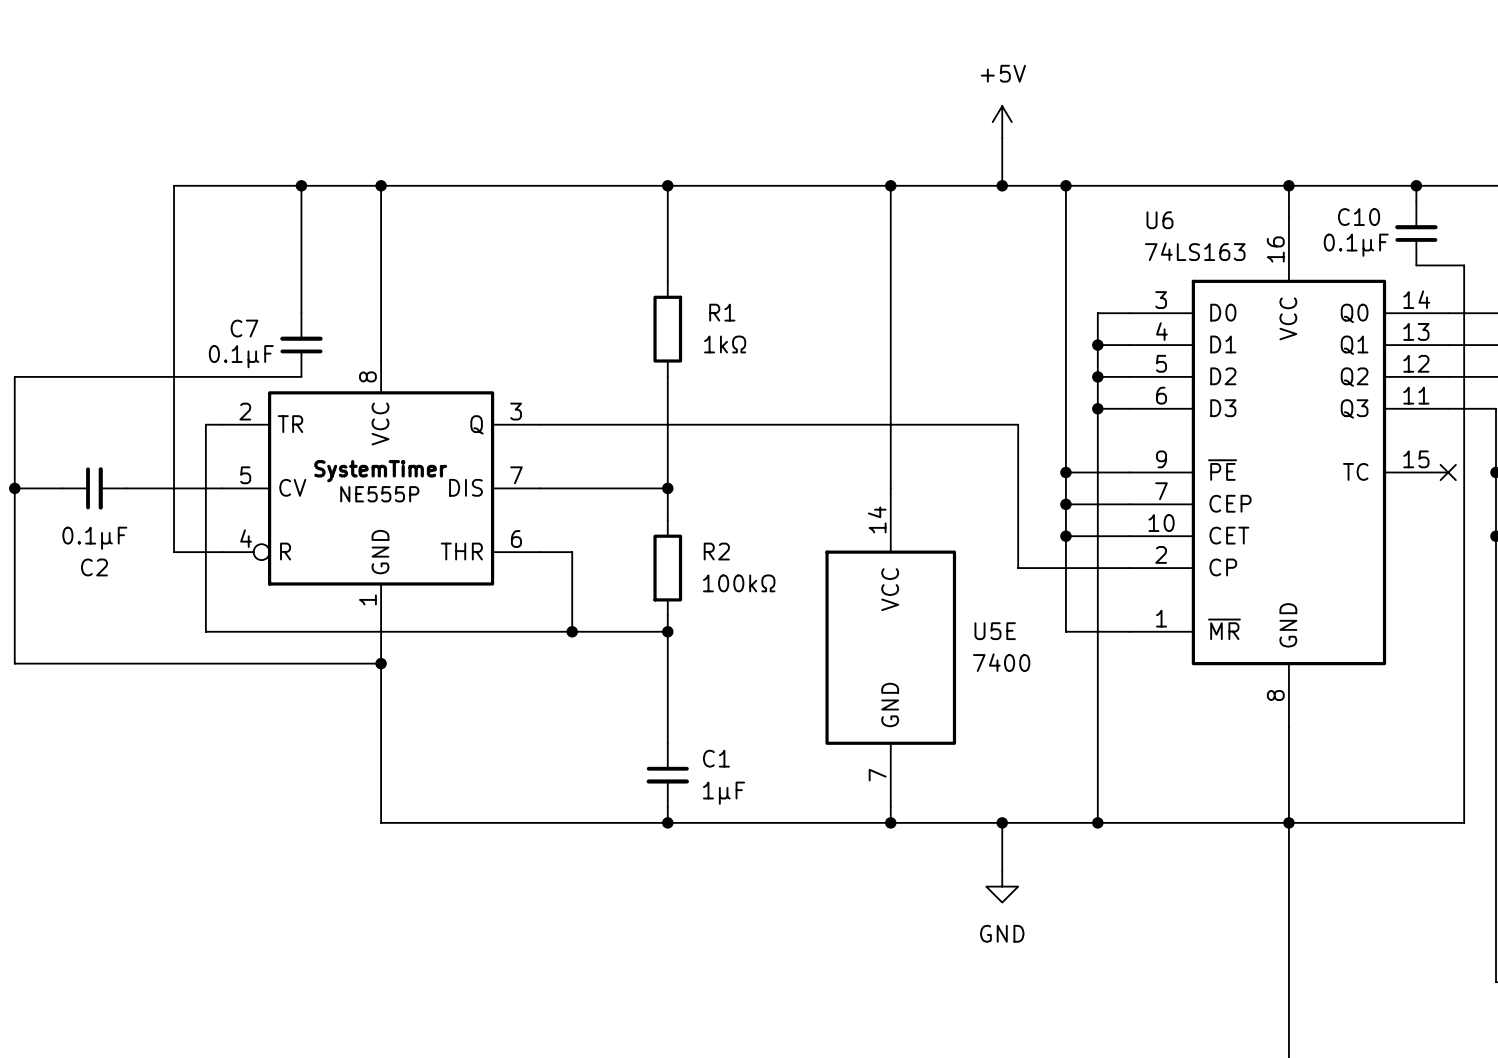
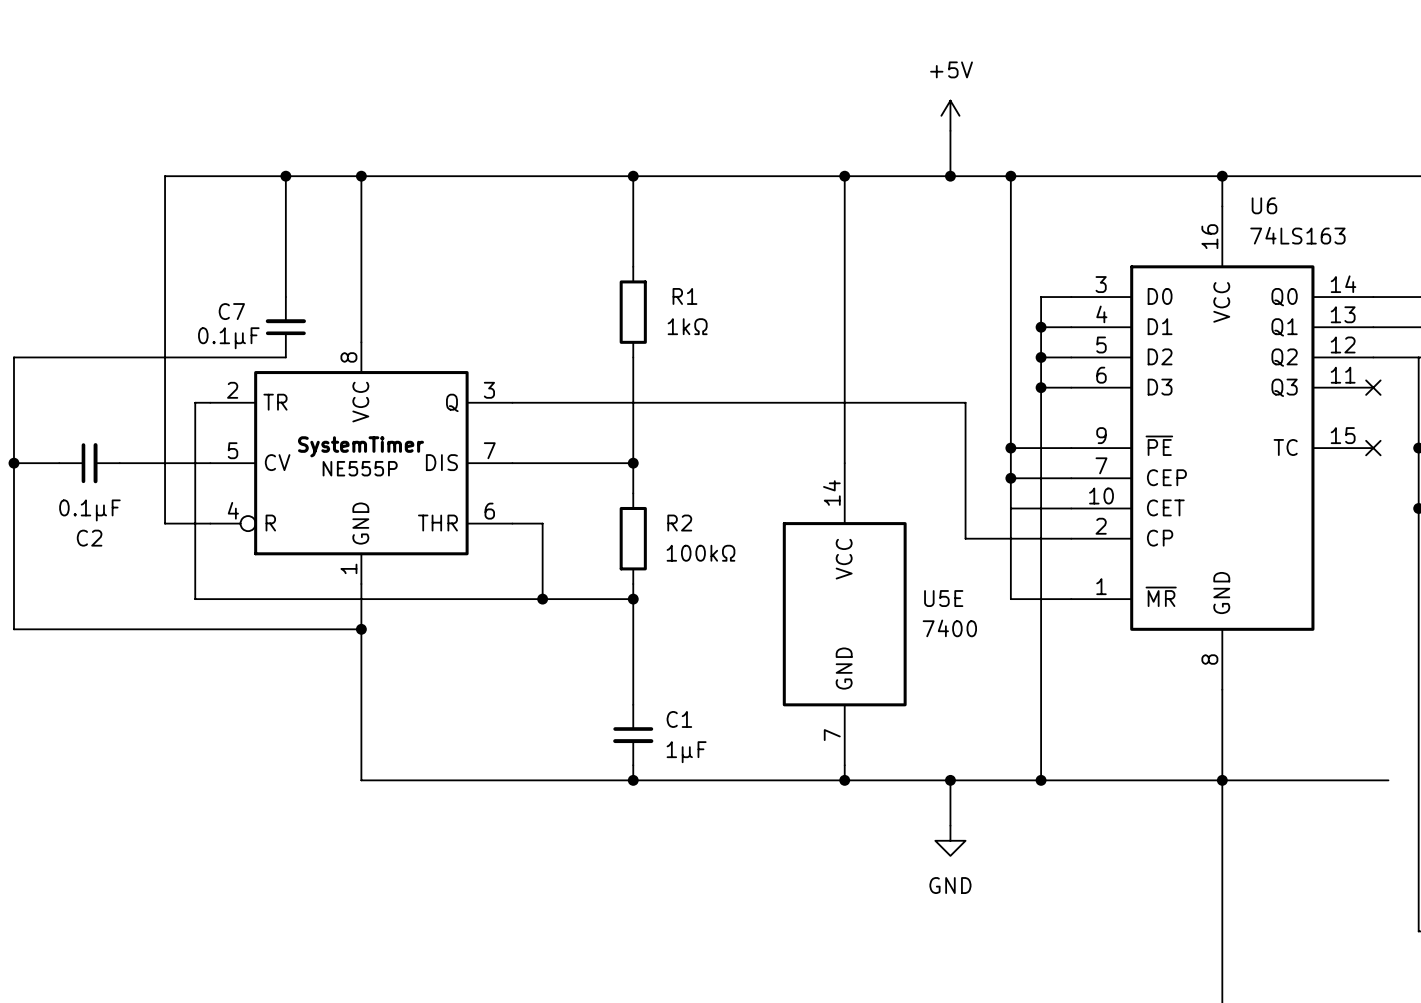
wire: (1416, 185) (1416, 201) -> none
junction: (1416, 185) -> none
U6 name position: U6 (1159, 220) -> U6 (1264, 205)
C10: 0.1µF (1416, 233) -> none
U6 value position: 74LS163 (1195, 251) -> 74LS163 (1297, 235)
wire: (1416, 265) (1464, 265) (1464, 822) -> none
wire: (1448, 408) (1496, 408) -> (1418, 357) (1418, 387)
no-connect mark: none -> (1373, 387)
junction: (1065, 536) -> none

